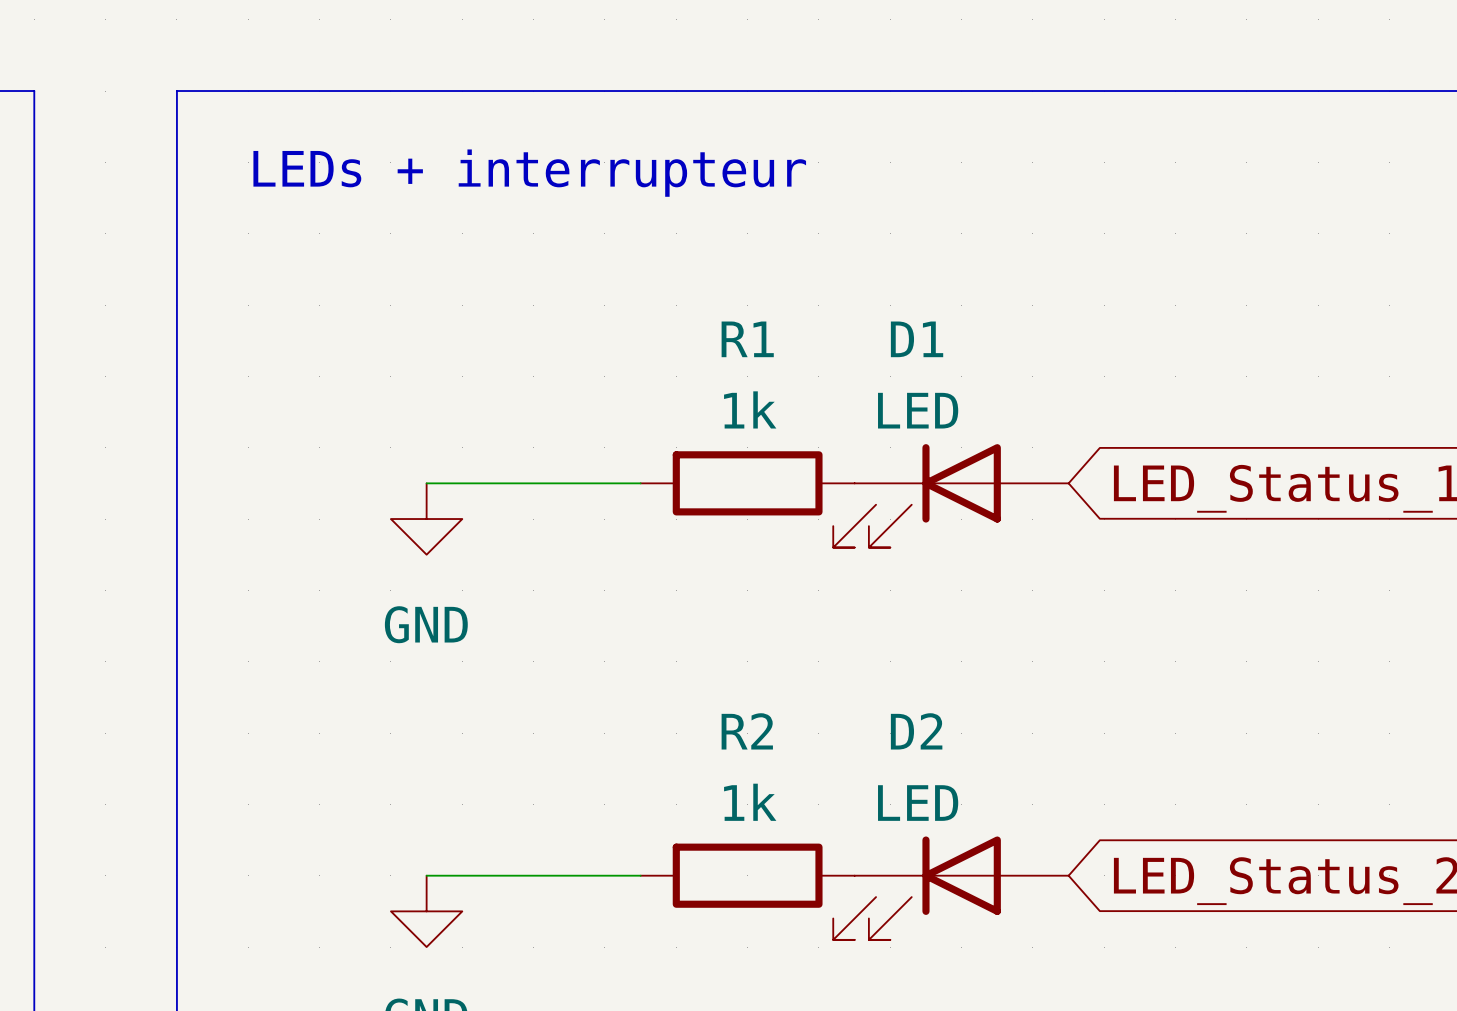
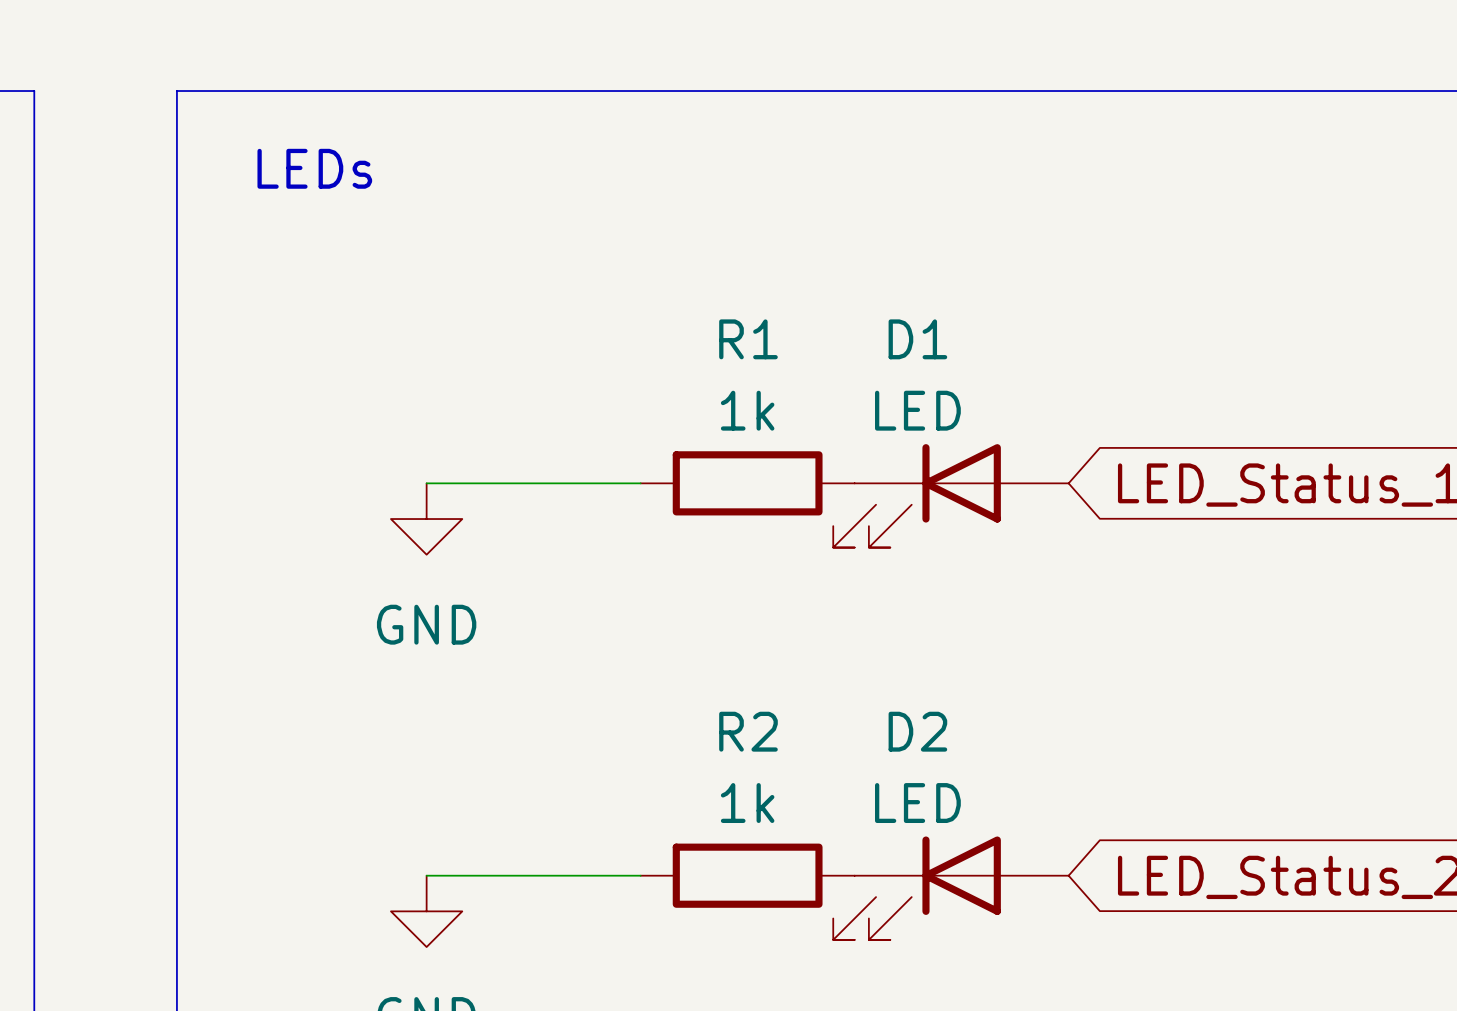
text: LEDs + interrupteur (529, 173) -> LEDs (314, 168)

